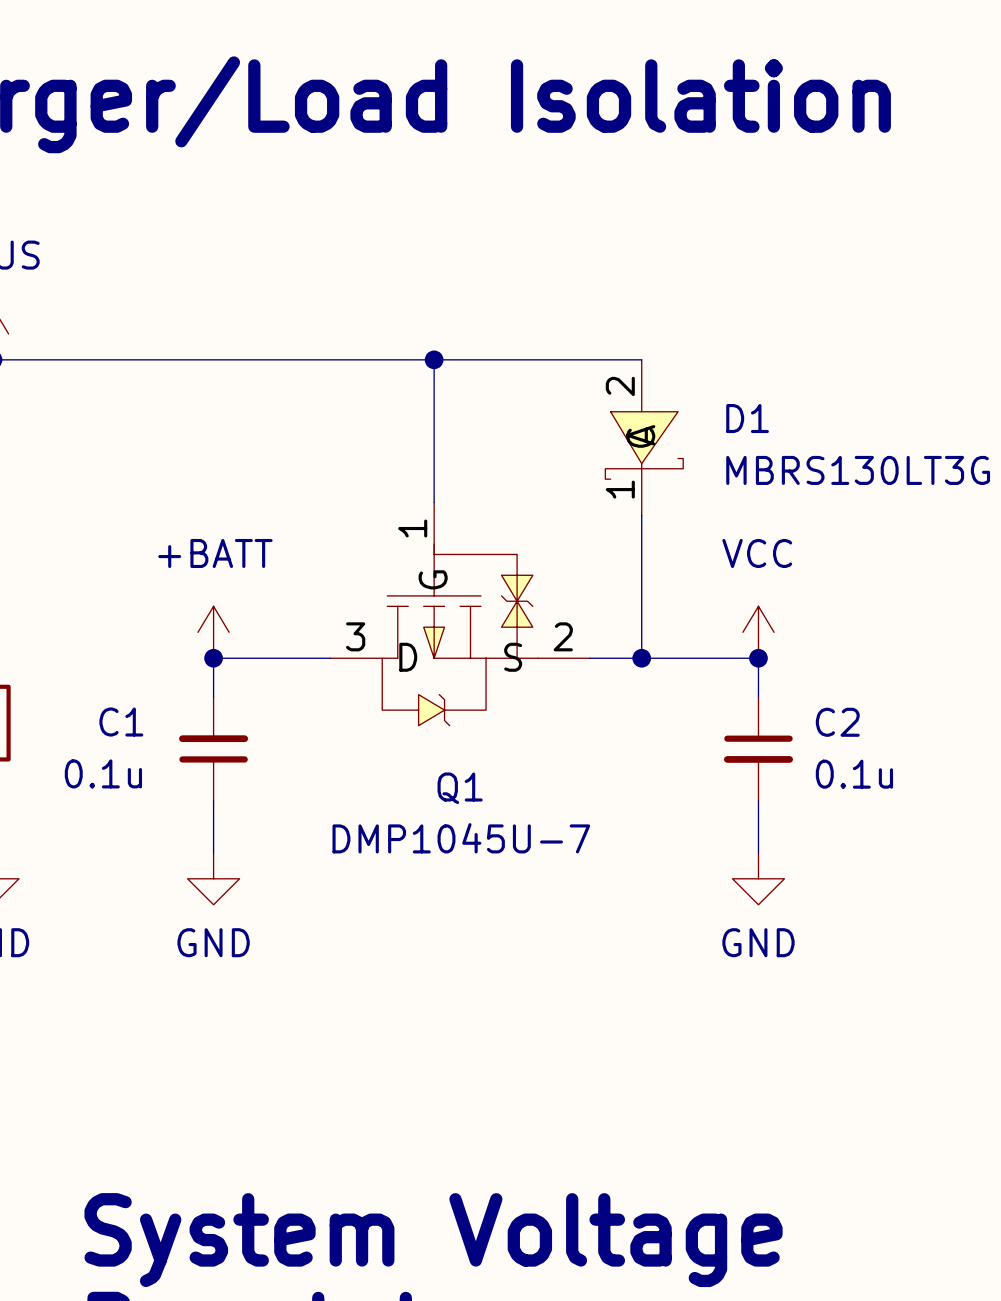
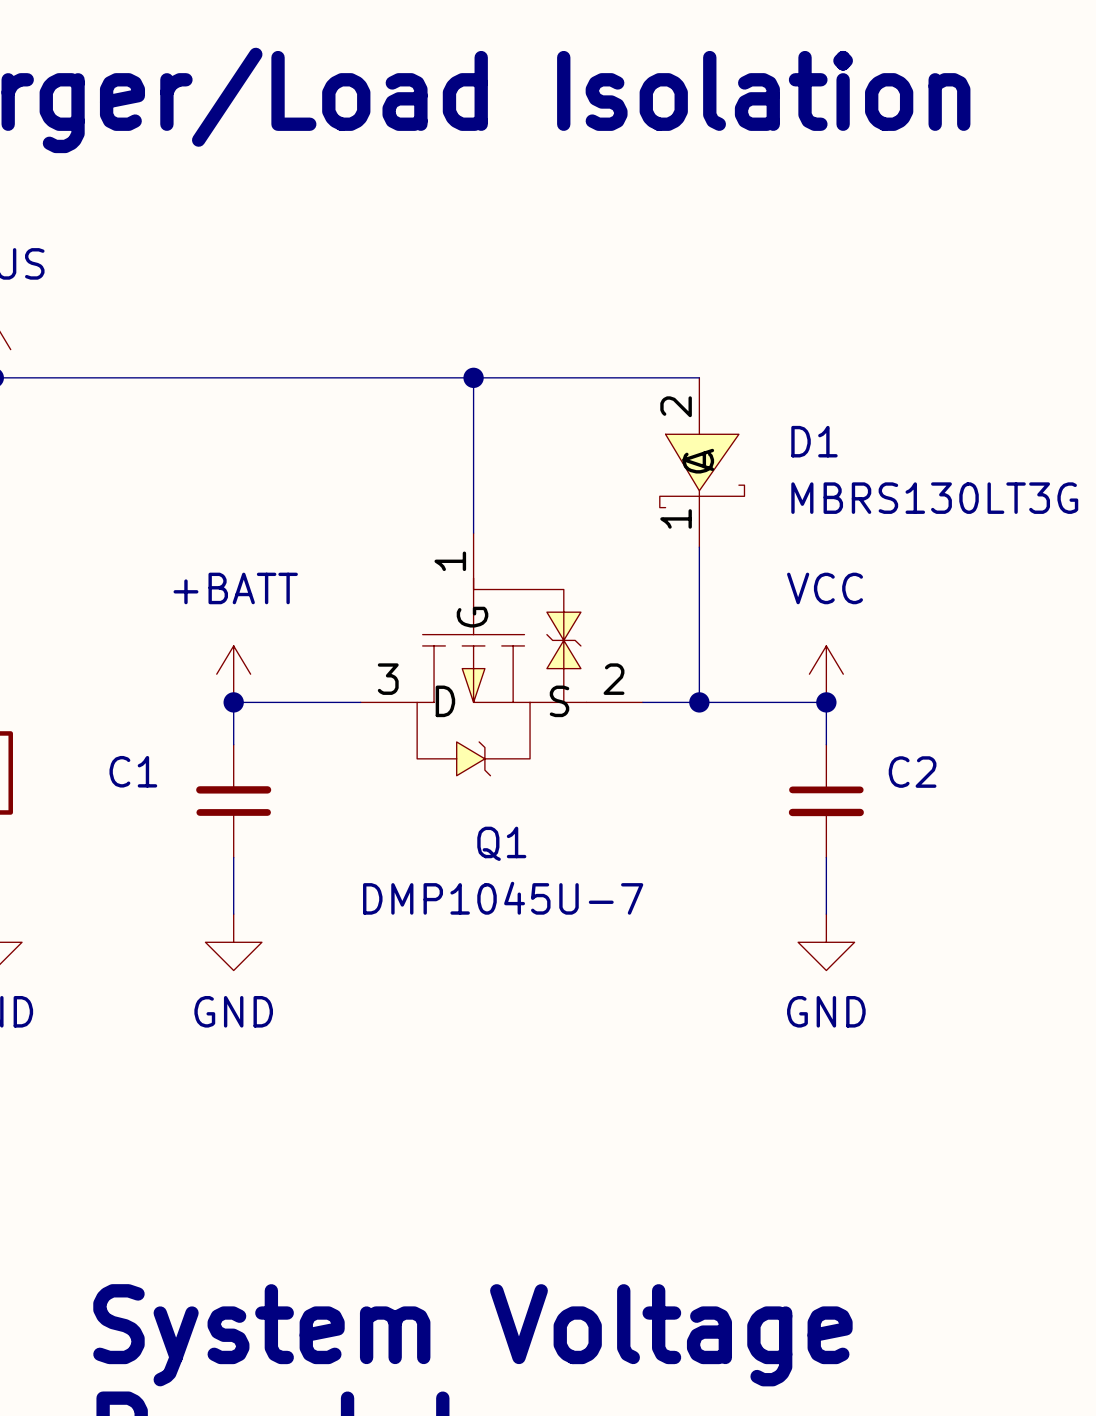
C1 value: 0.1u (103, 773) -> none
C2 value: 0.1u (854, 774) -> none

